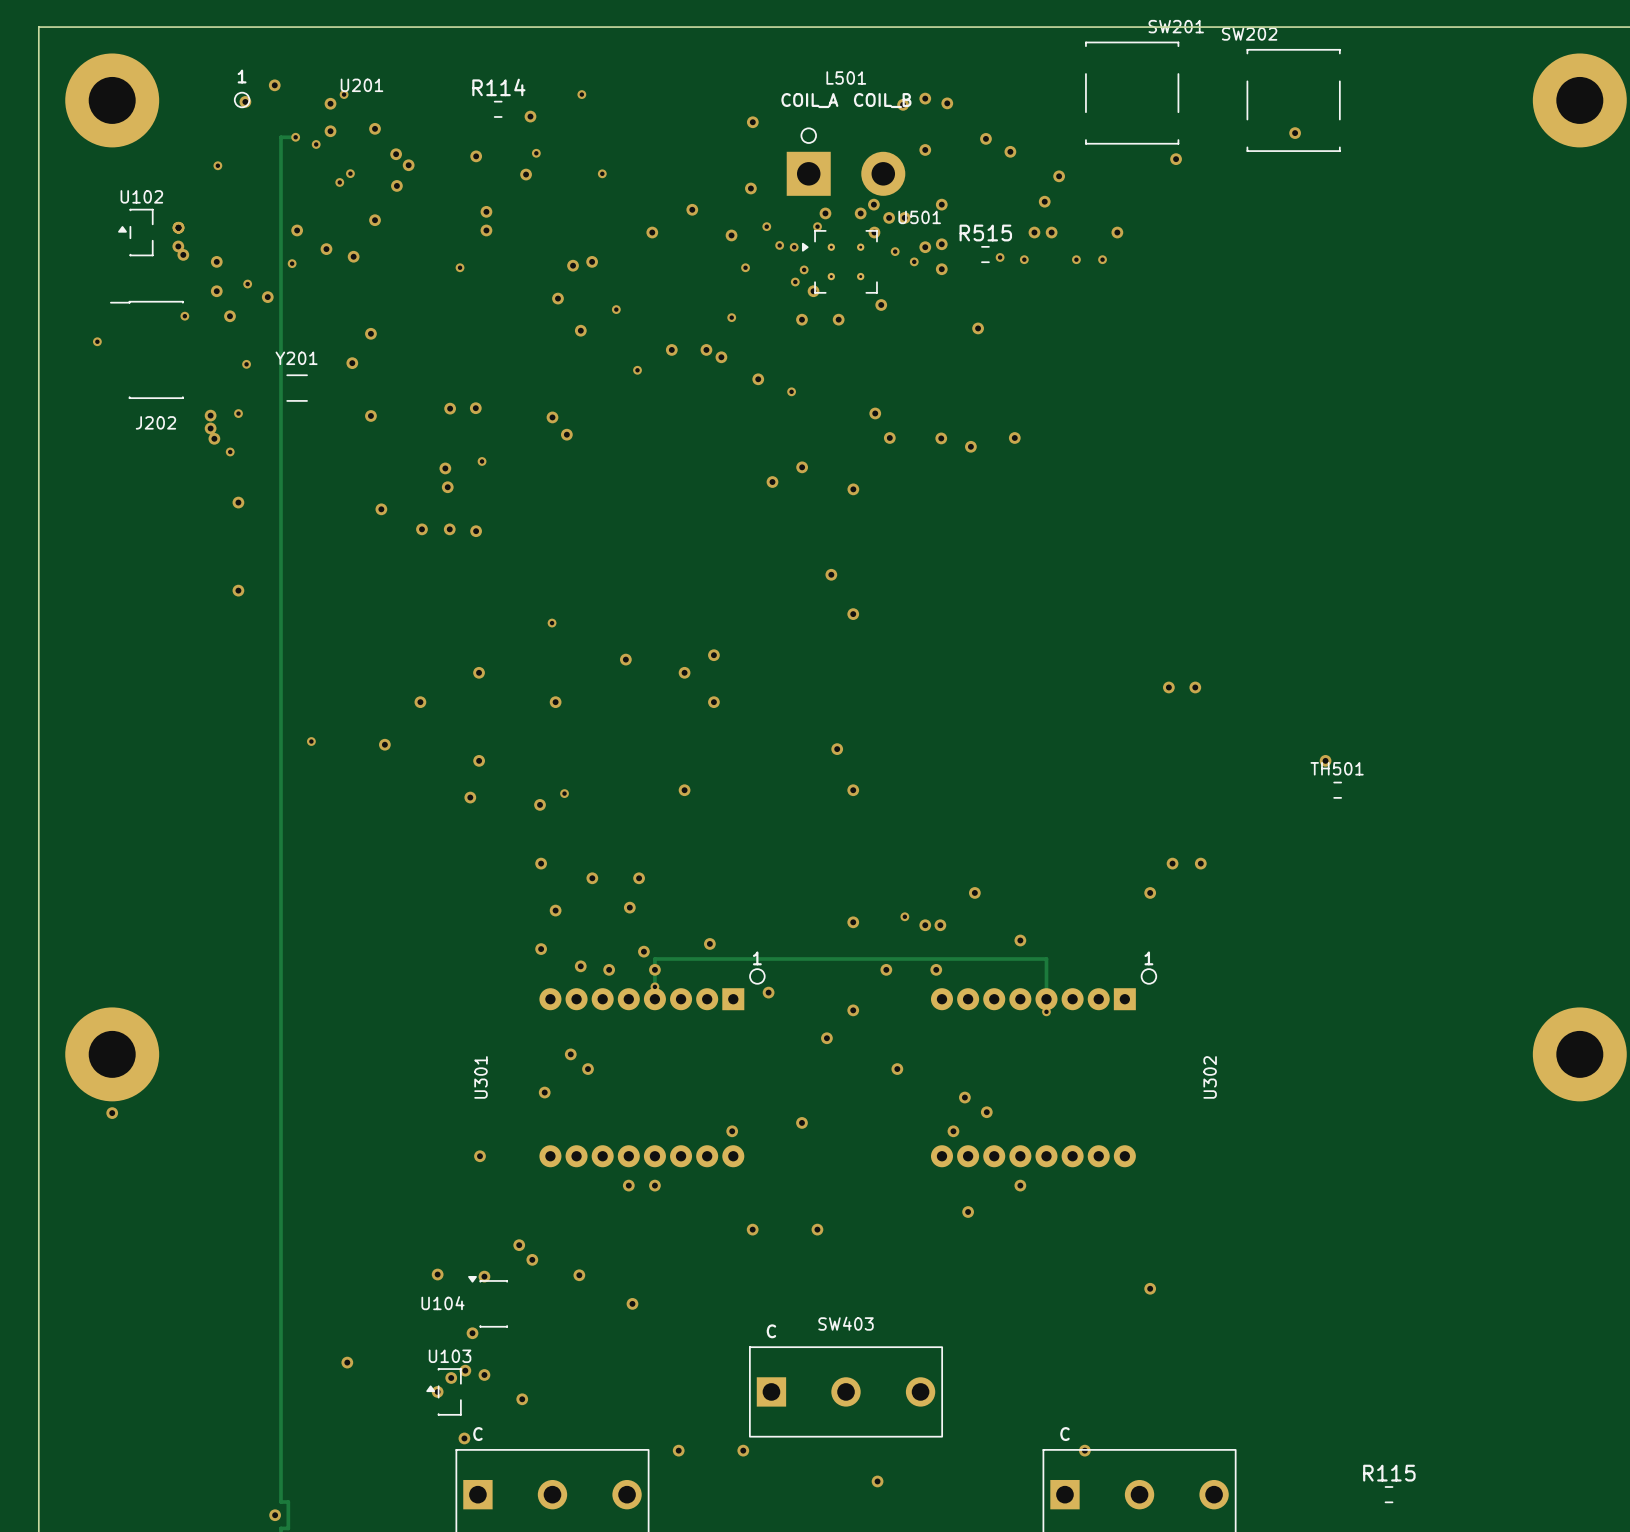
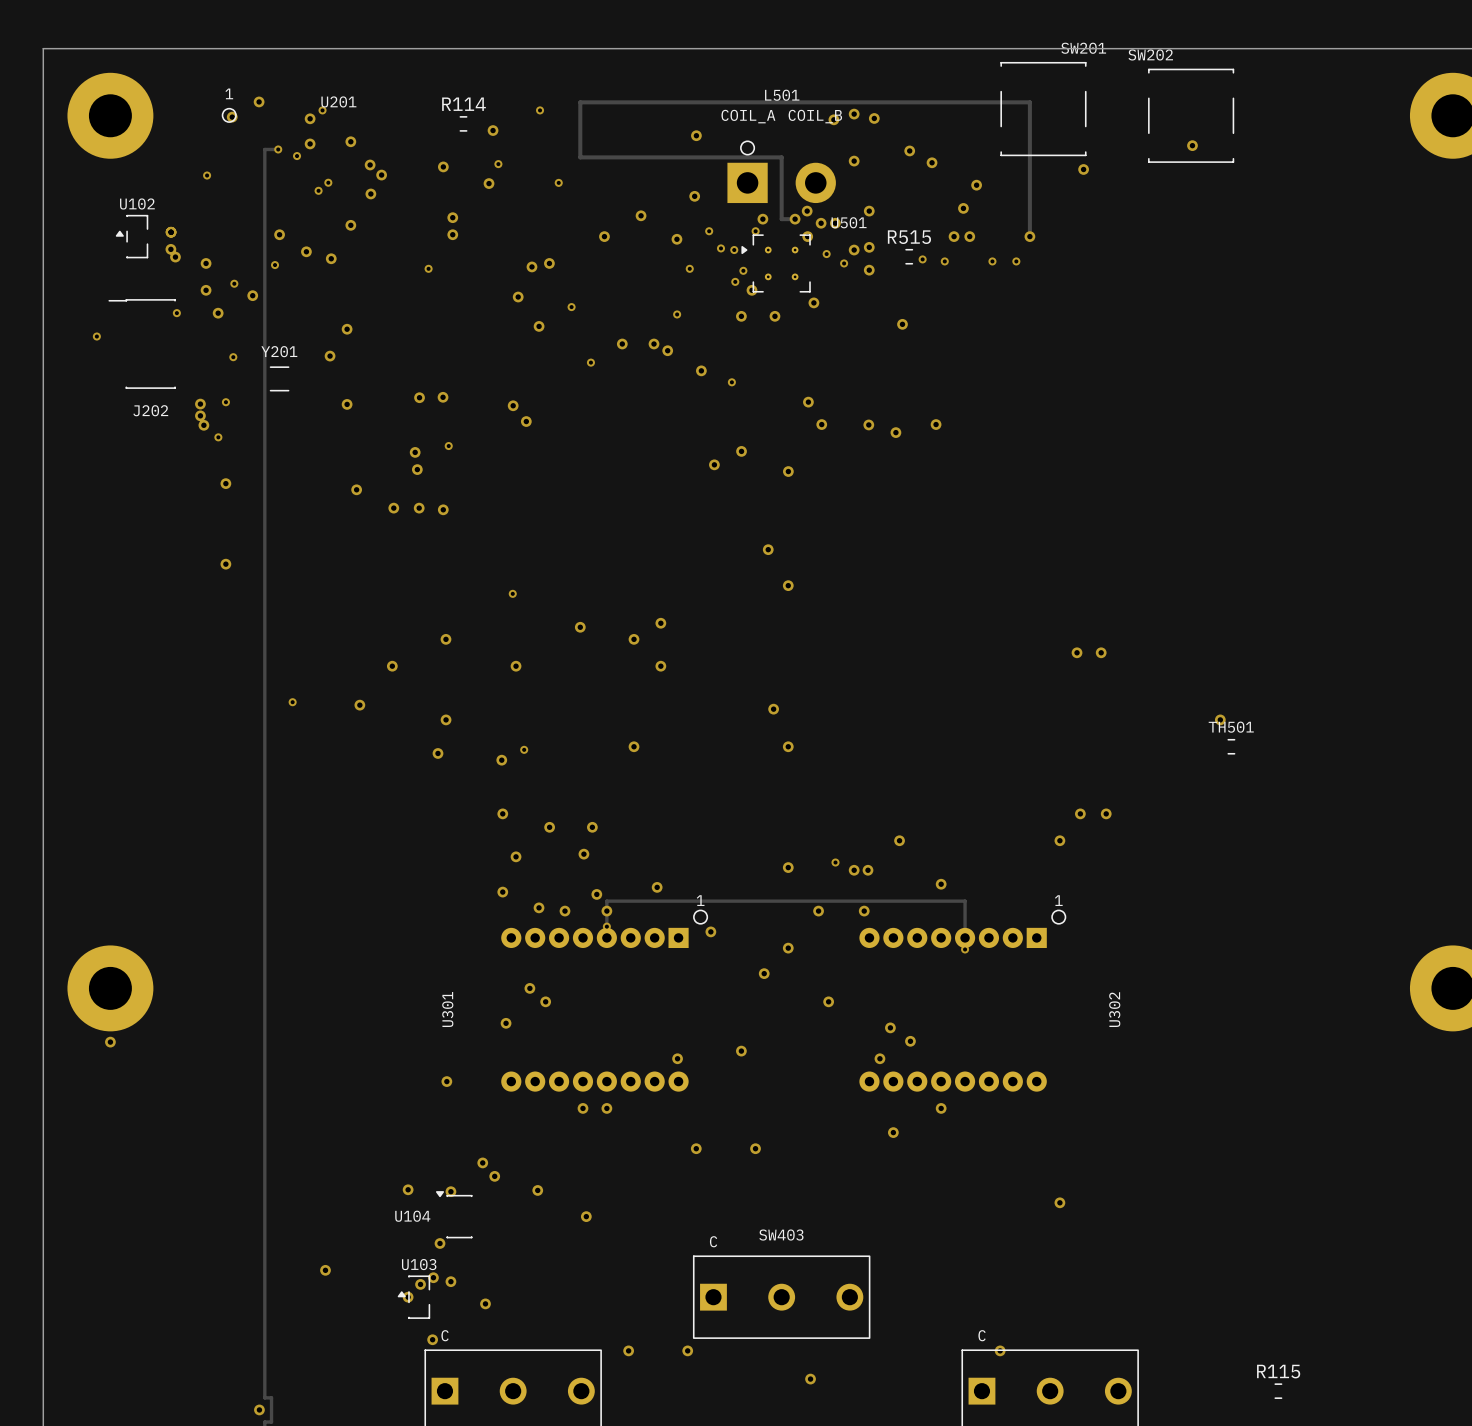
track: none -> (795, 219) (781, 219) (781, 157) (580, 157) (580, 102) (1029, 102) (1029, 236)

